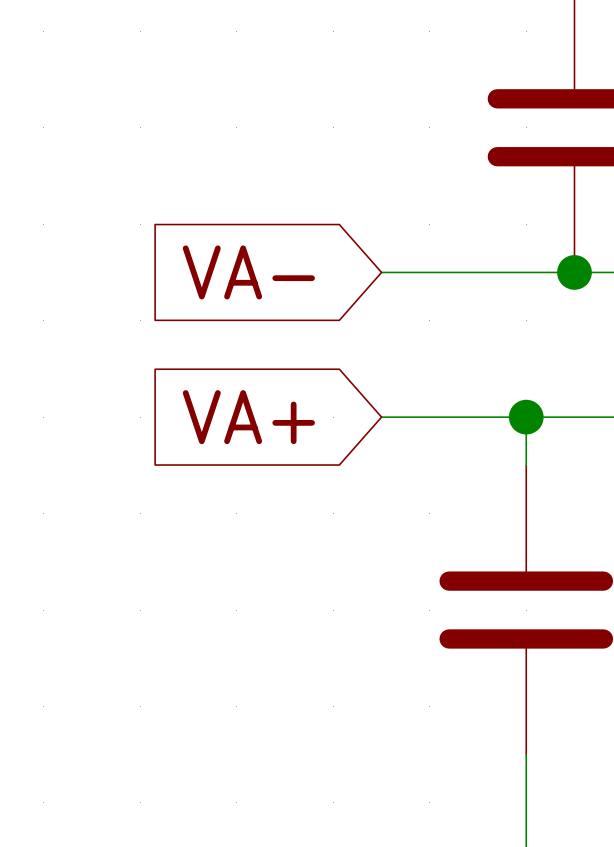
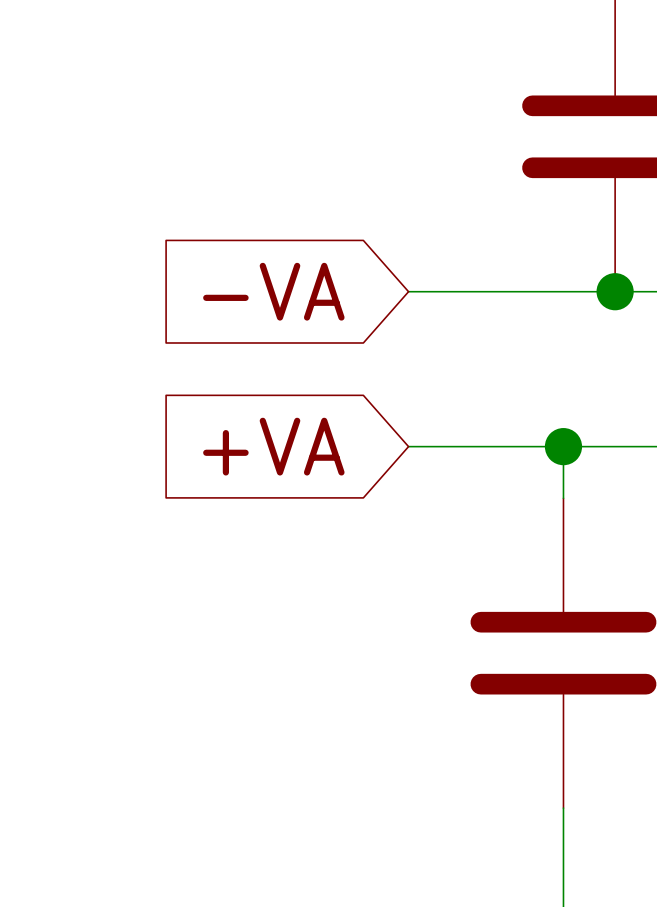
global label: VA- (248, 272) -> -VA (273, 291)
global label: VA+ (248, 417) -> +VA (273, 446)

